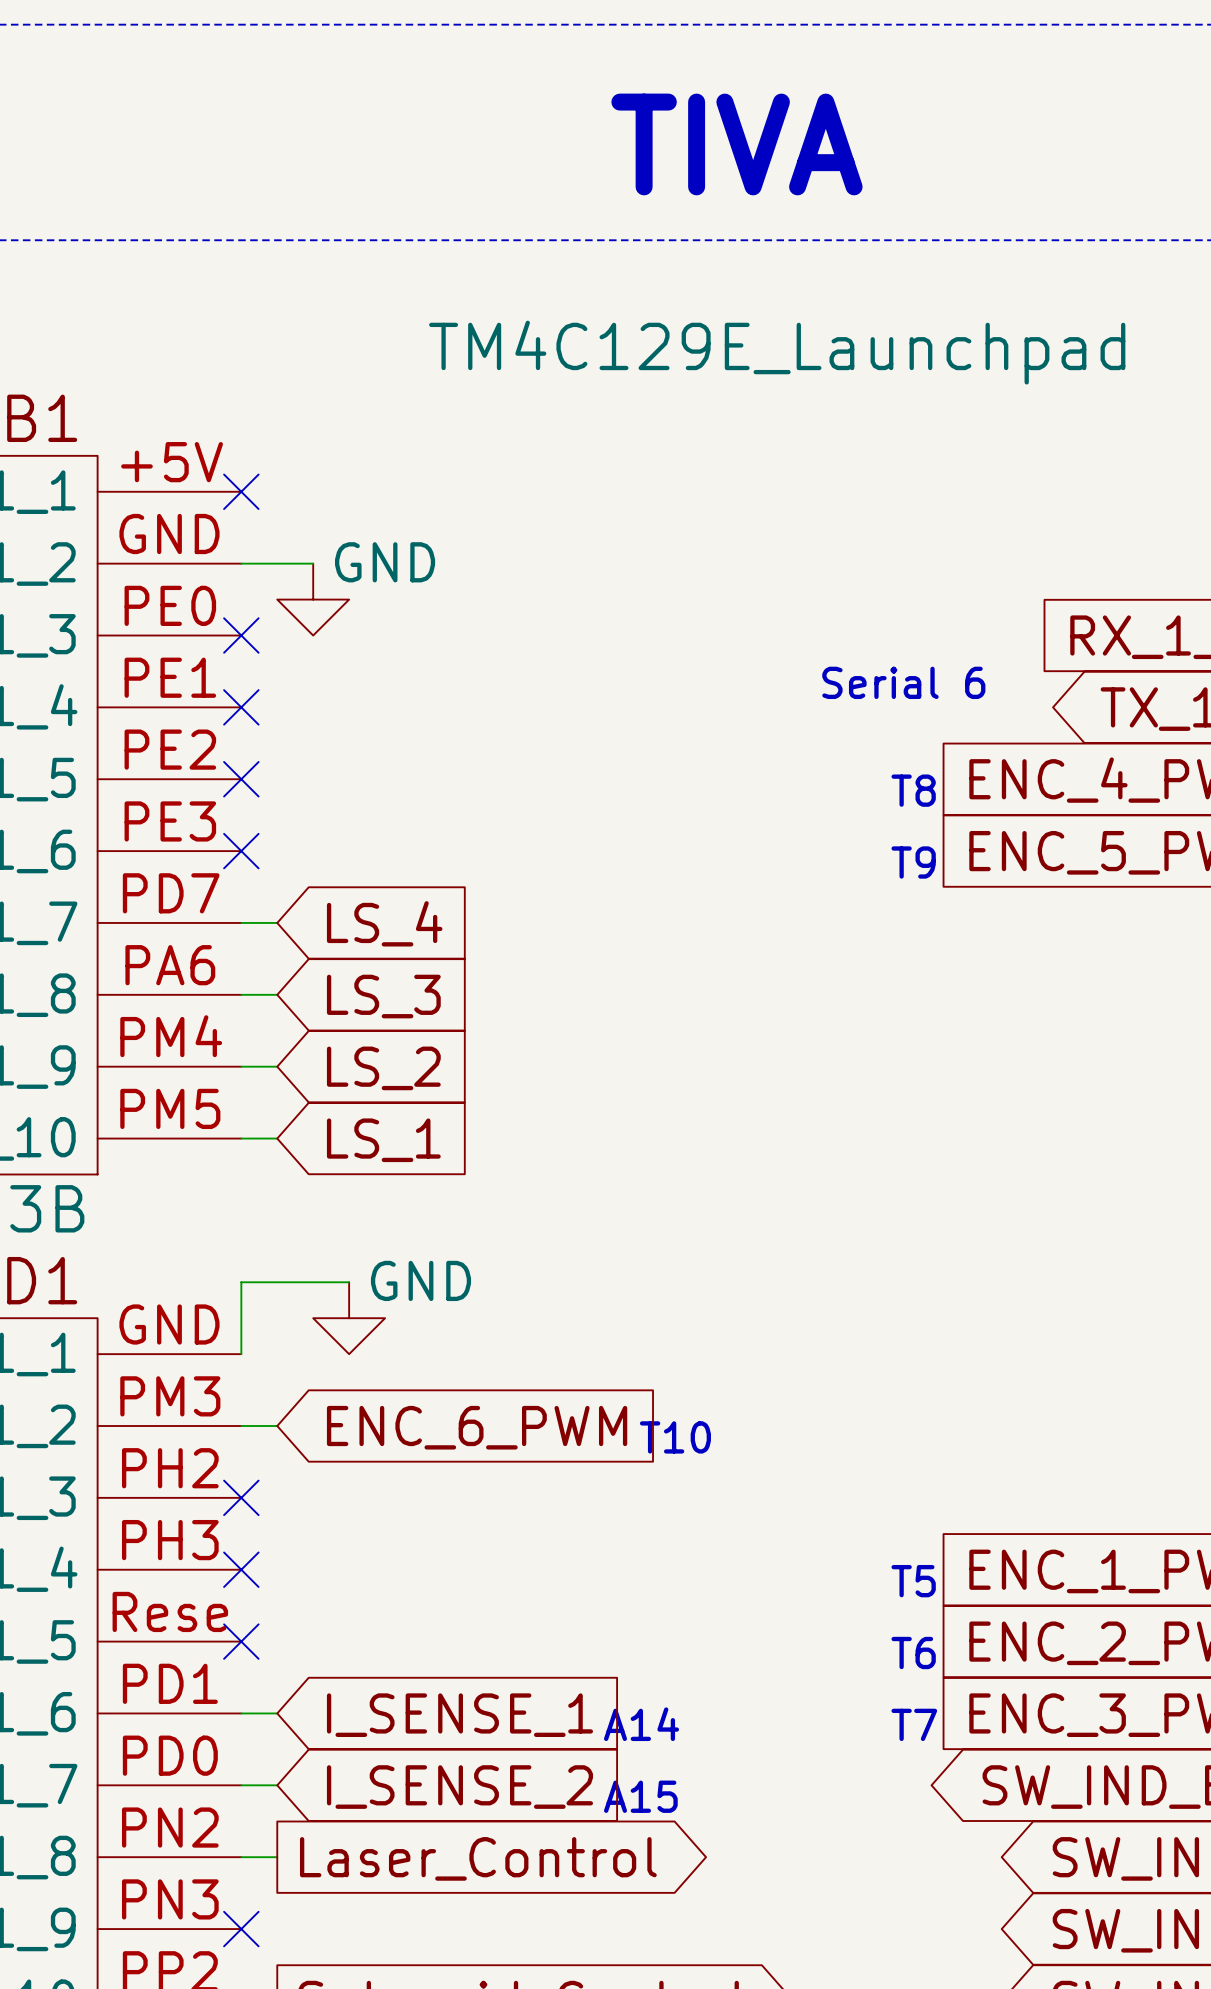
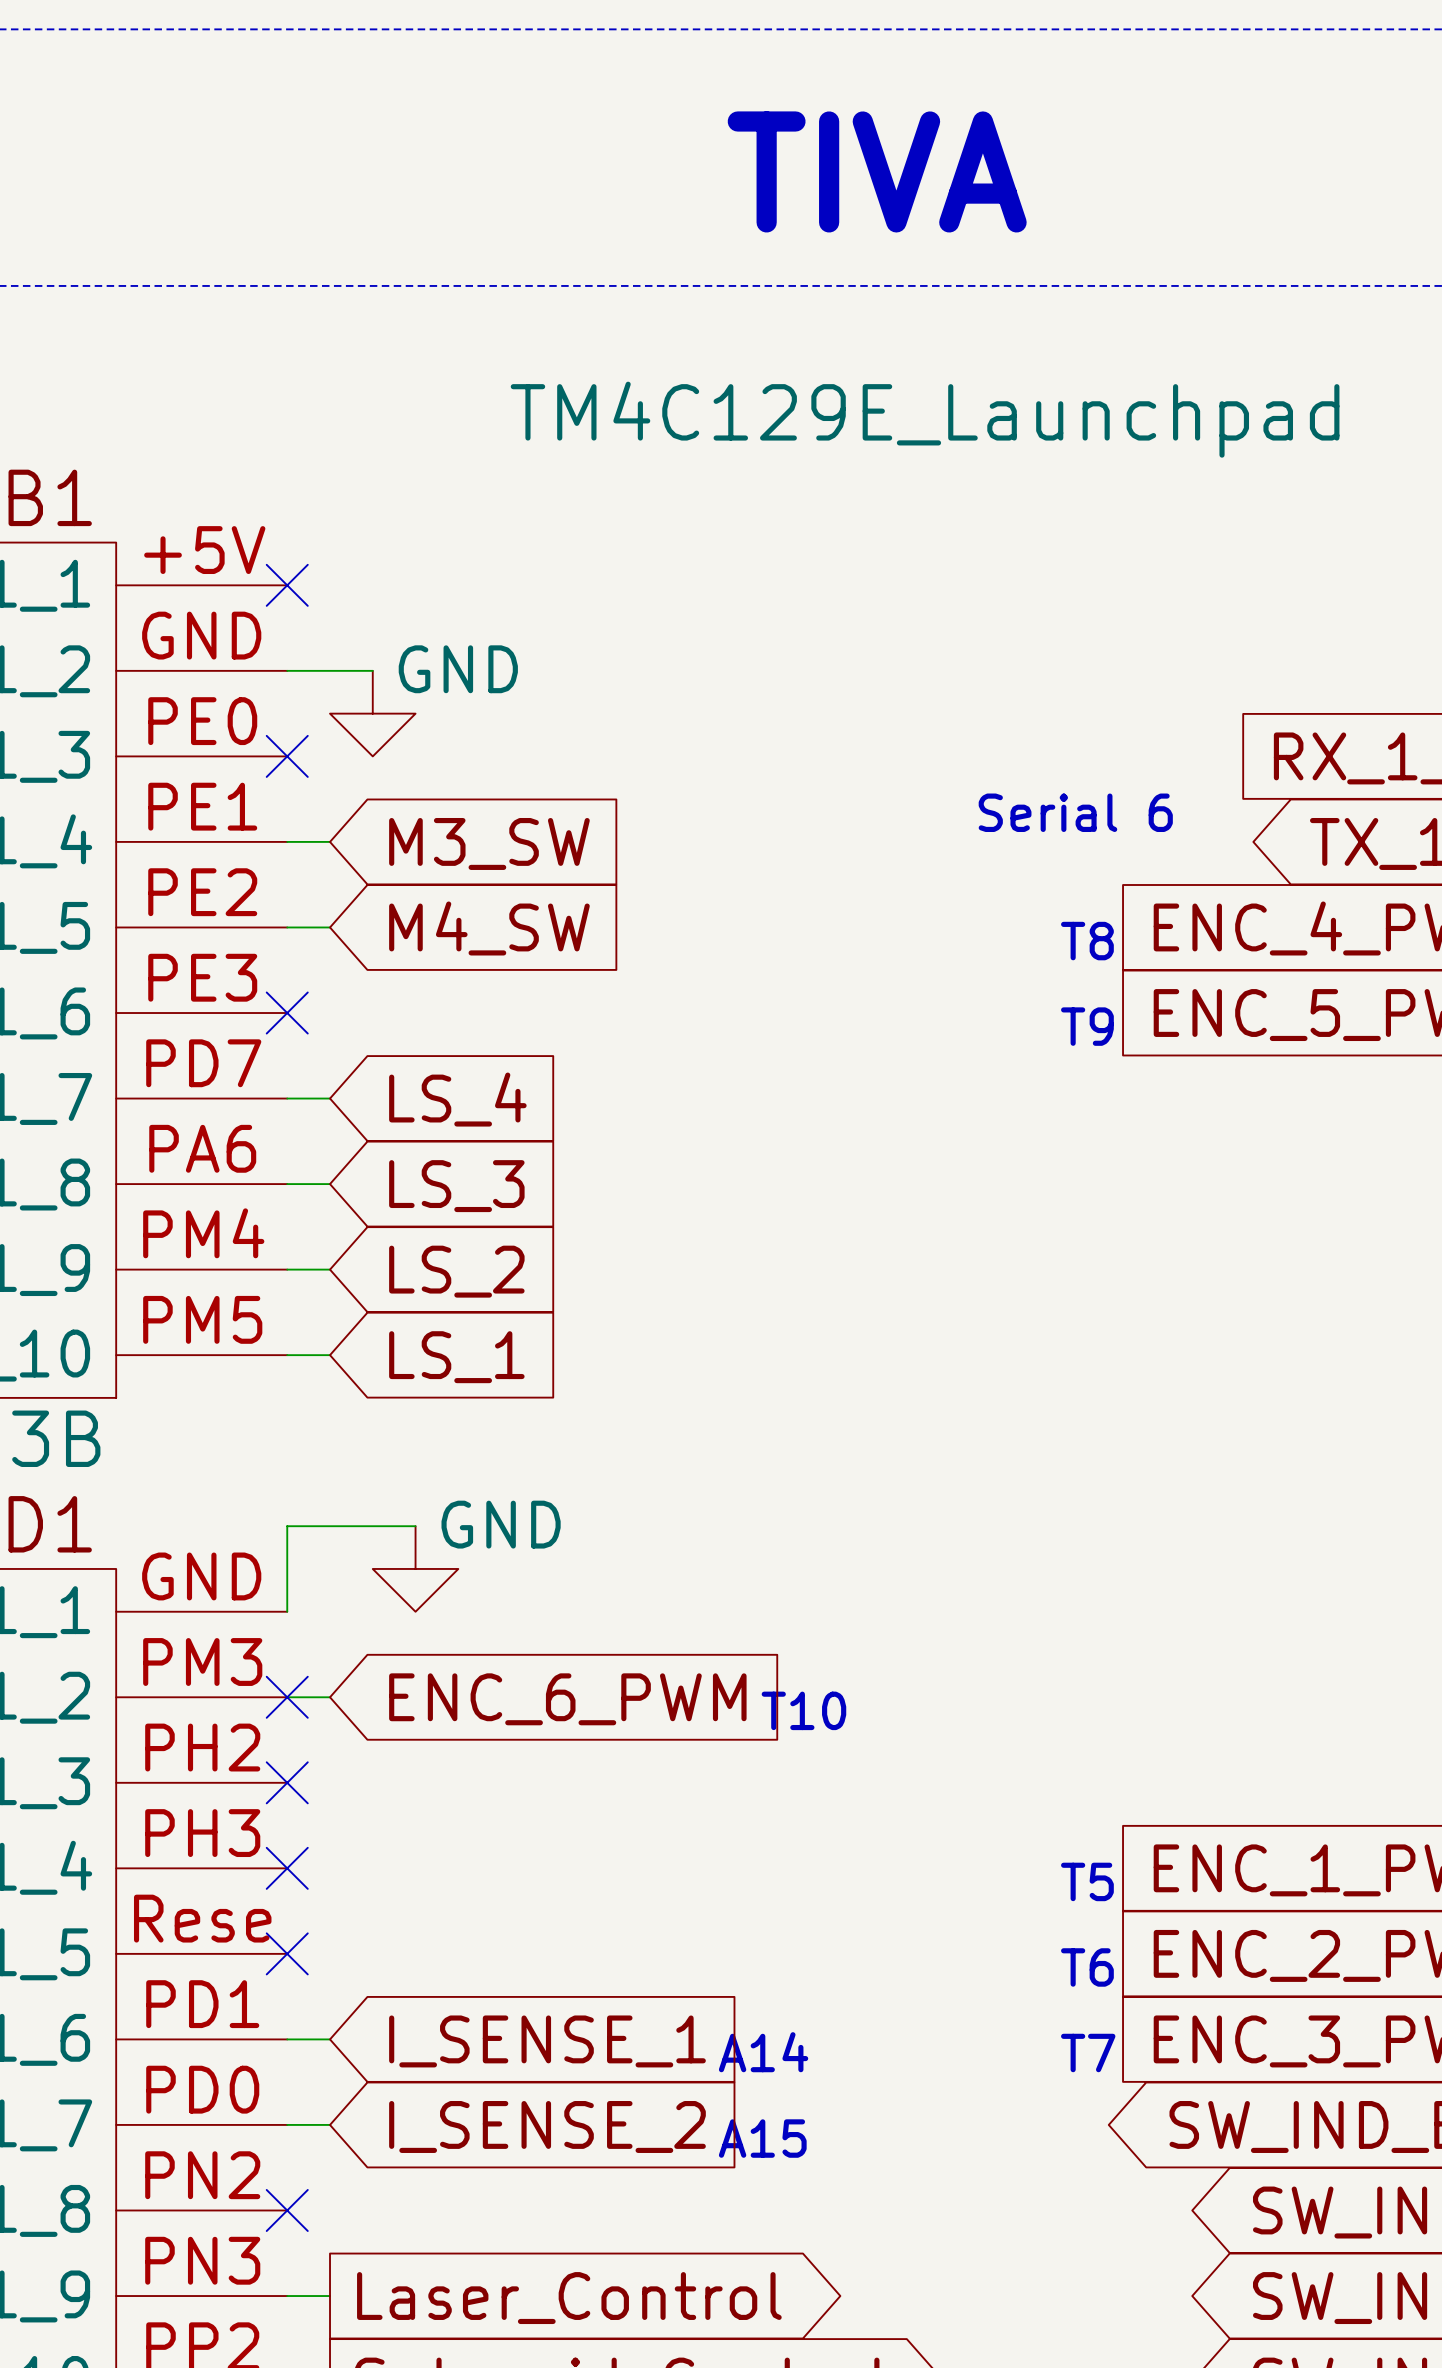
wire: none -> (287, 841) (330, 841)
no-connect mark: (241, 707) -> none
global label: none -> M3_SW (489, 843)
wire: none -> (287, 927) (330, 927)
no-connect mark: (241, 779) -> none
global label: none -> M4_SW (489, 928)
no-connect mark: none -> (287, 1697)
wire: (241, 1857) (277, 1857) -> (287, 2296) (330, 2296)
global label position: Laser_Control (478, 1858) -> Laser_Control (569, 2298)
no-connect mark position: (241, 1929) -> (287, 2210)

